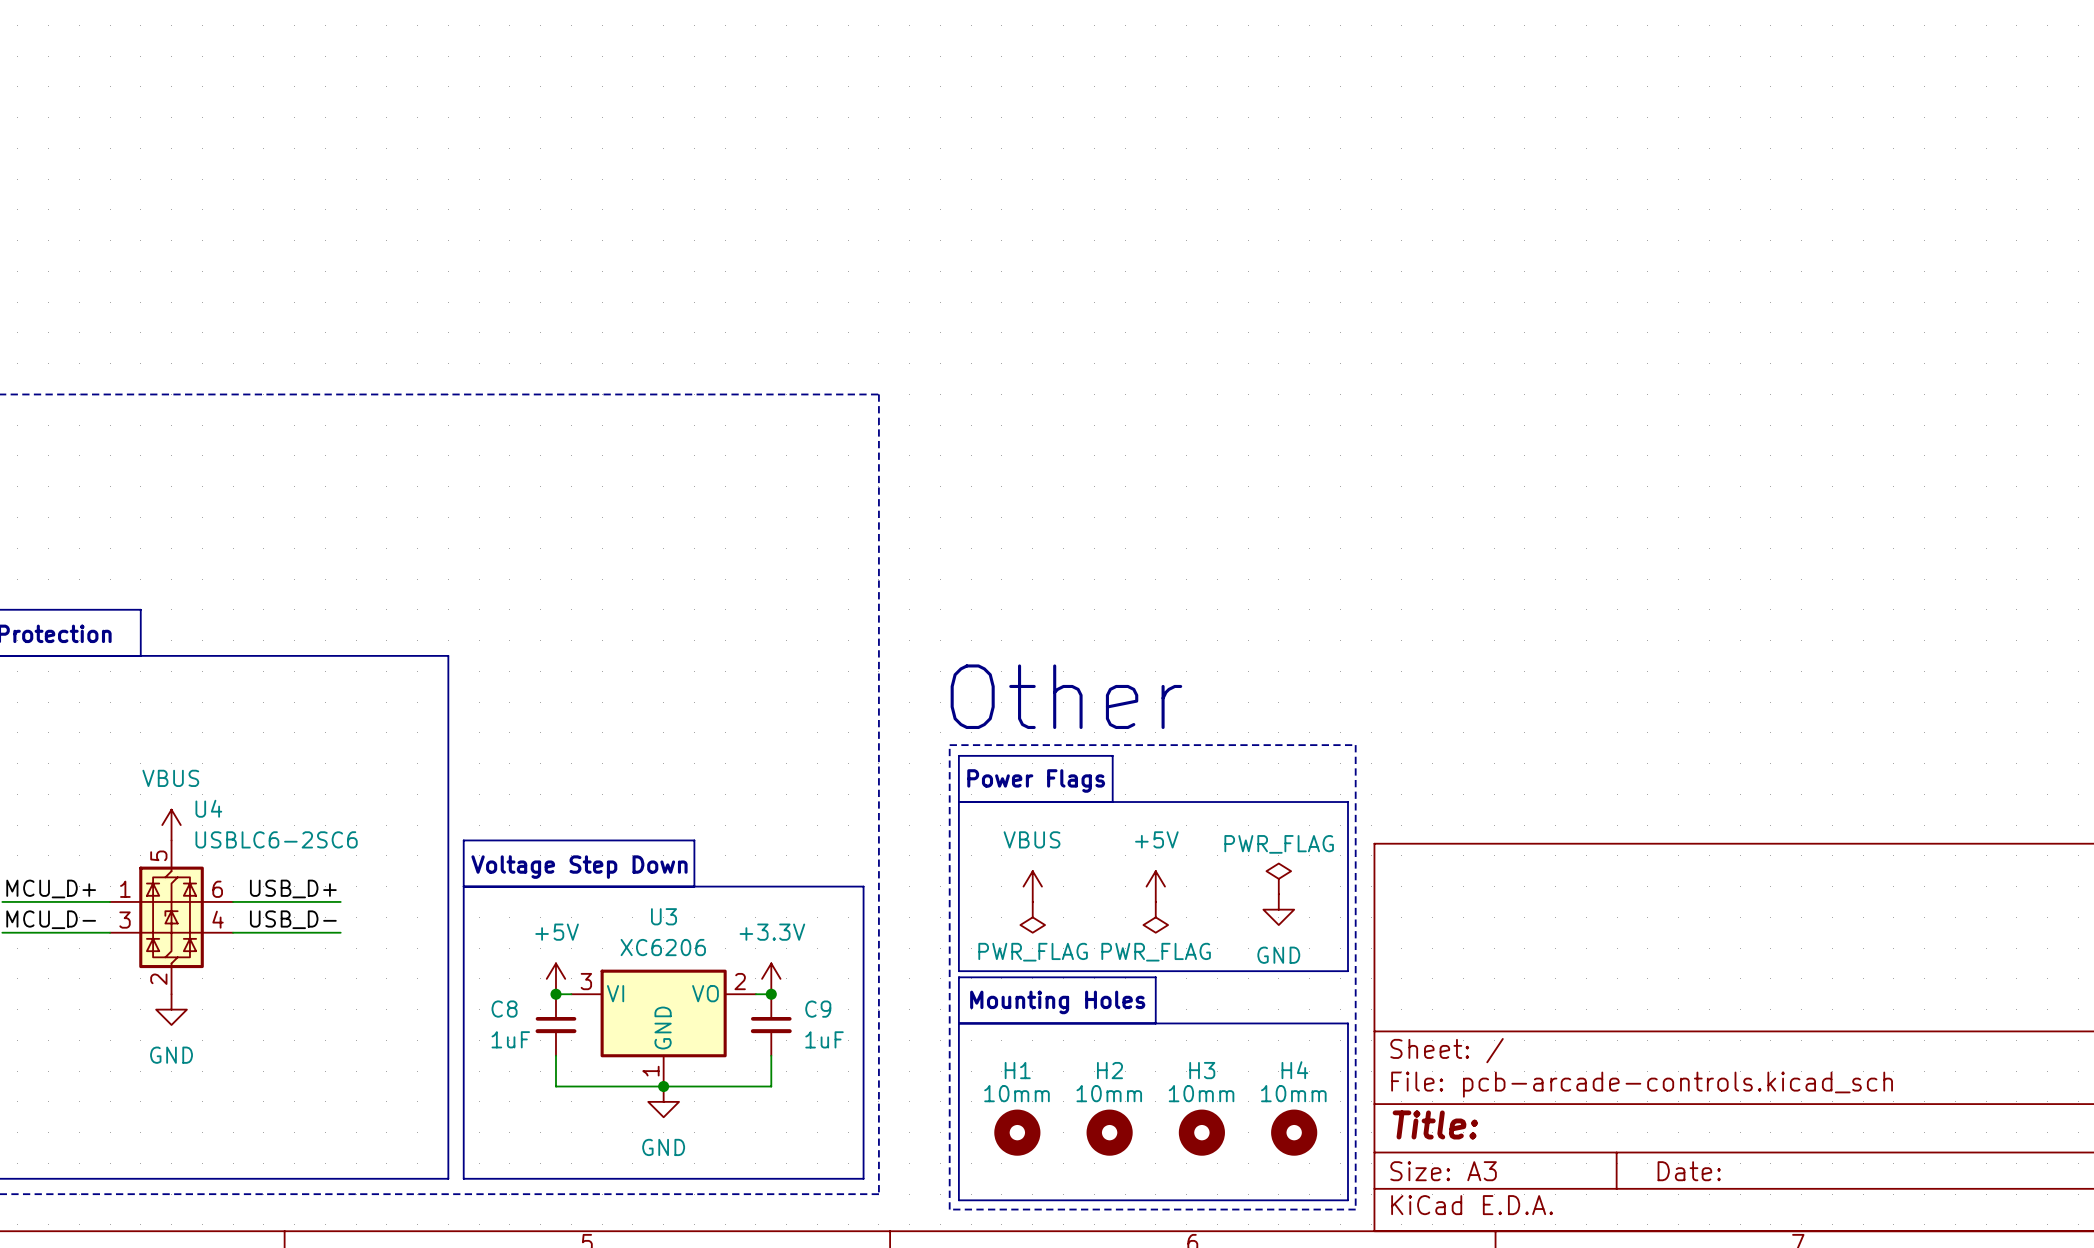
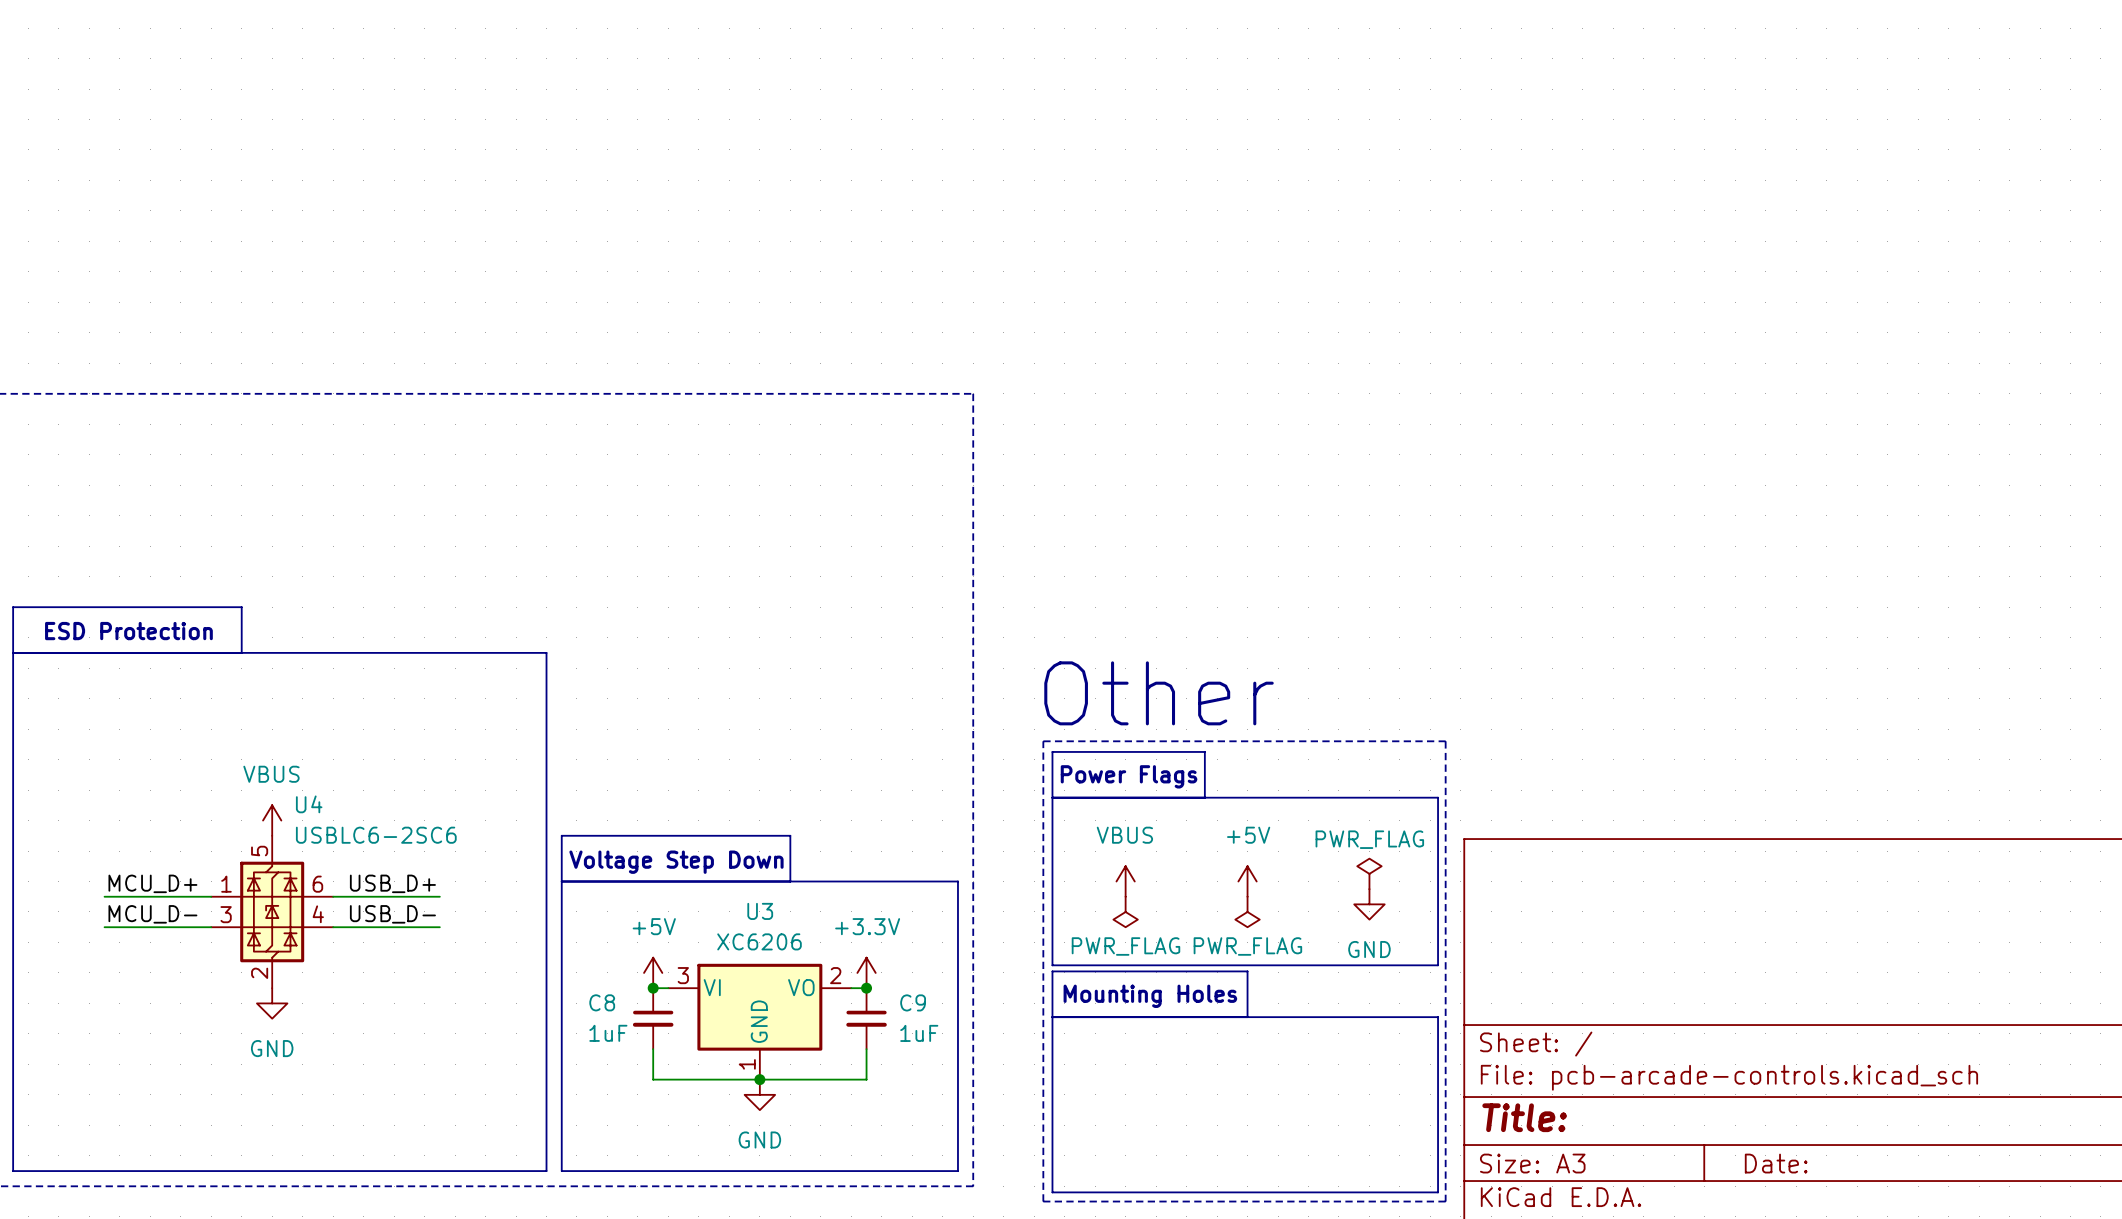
H1: 10mm (1017, 1132) -> none
H2: 10mm (1109, 1132) -> none
H3: 10mm (1201, 1132) -> none
H4: 10mm (1294, 1132) -> none

